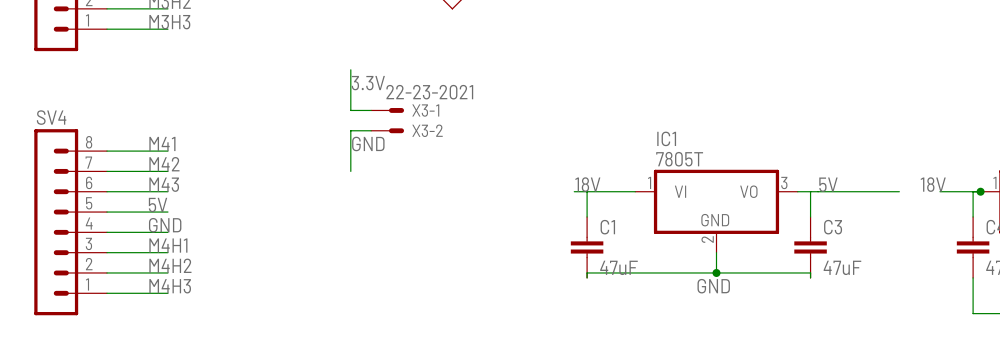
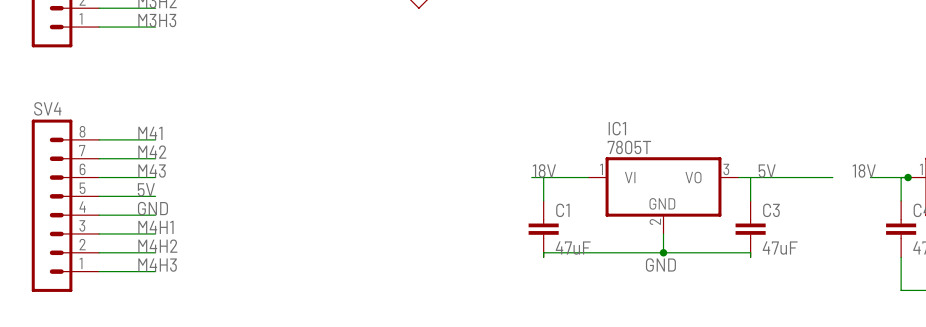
wire: (350, 69) (350, 110) (371, 110) -> none
label: 3.3V (368, 83) -> none
X3-1: 22-23-2021 (387, 110) -> none
wire: (371, 130) (350, 130) (350, 171) -> none
X3-2: (387, 130) -> none
label: GND (368, 143) -> none

